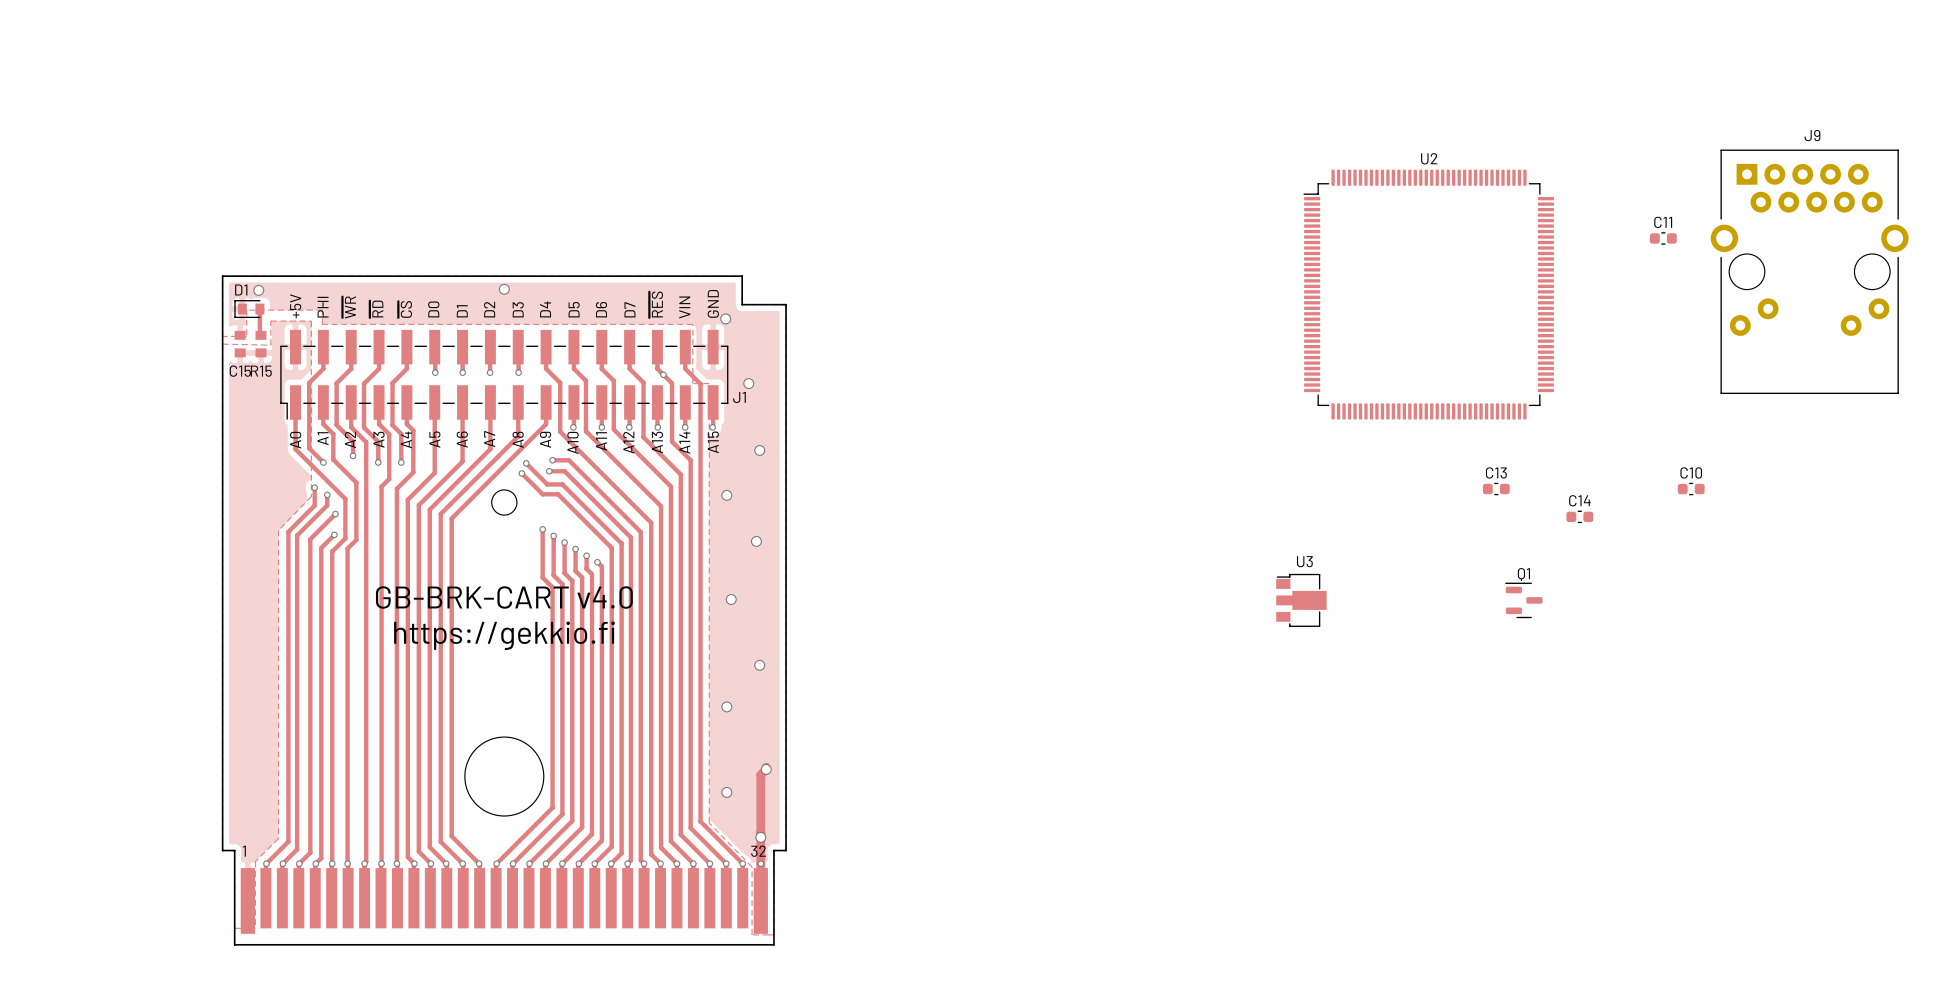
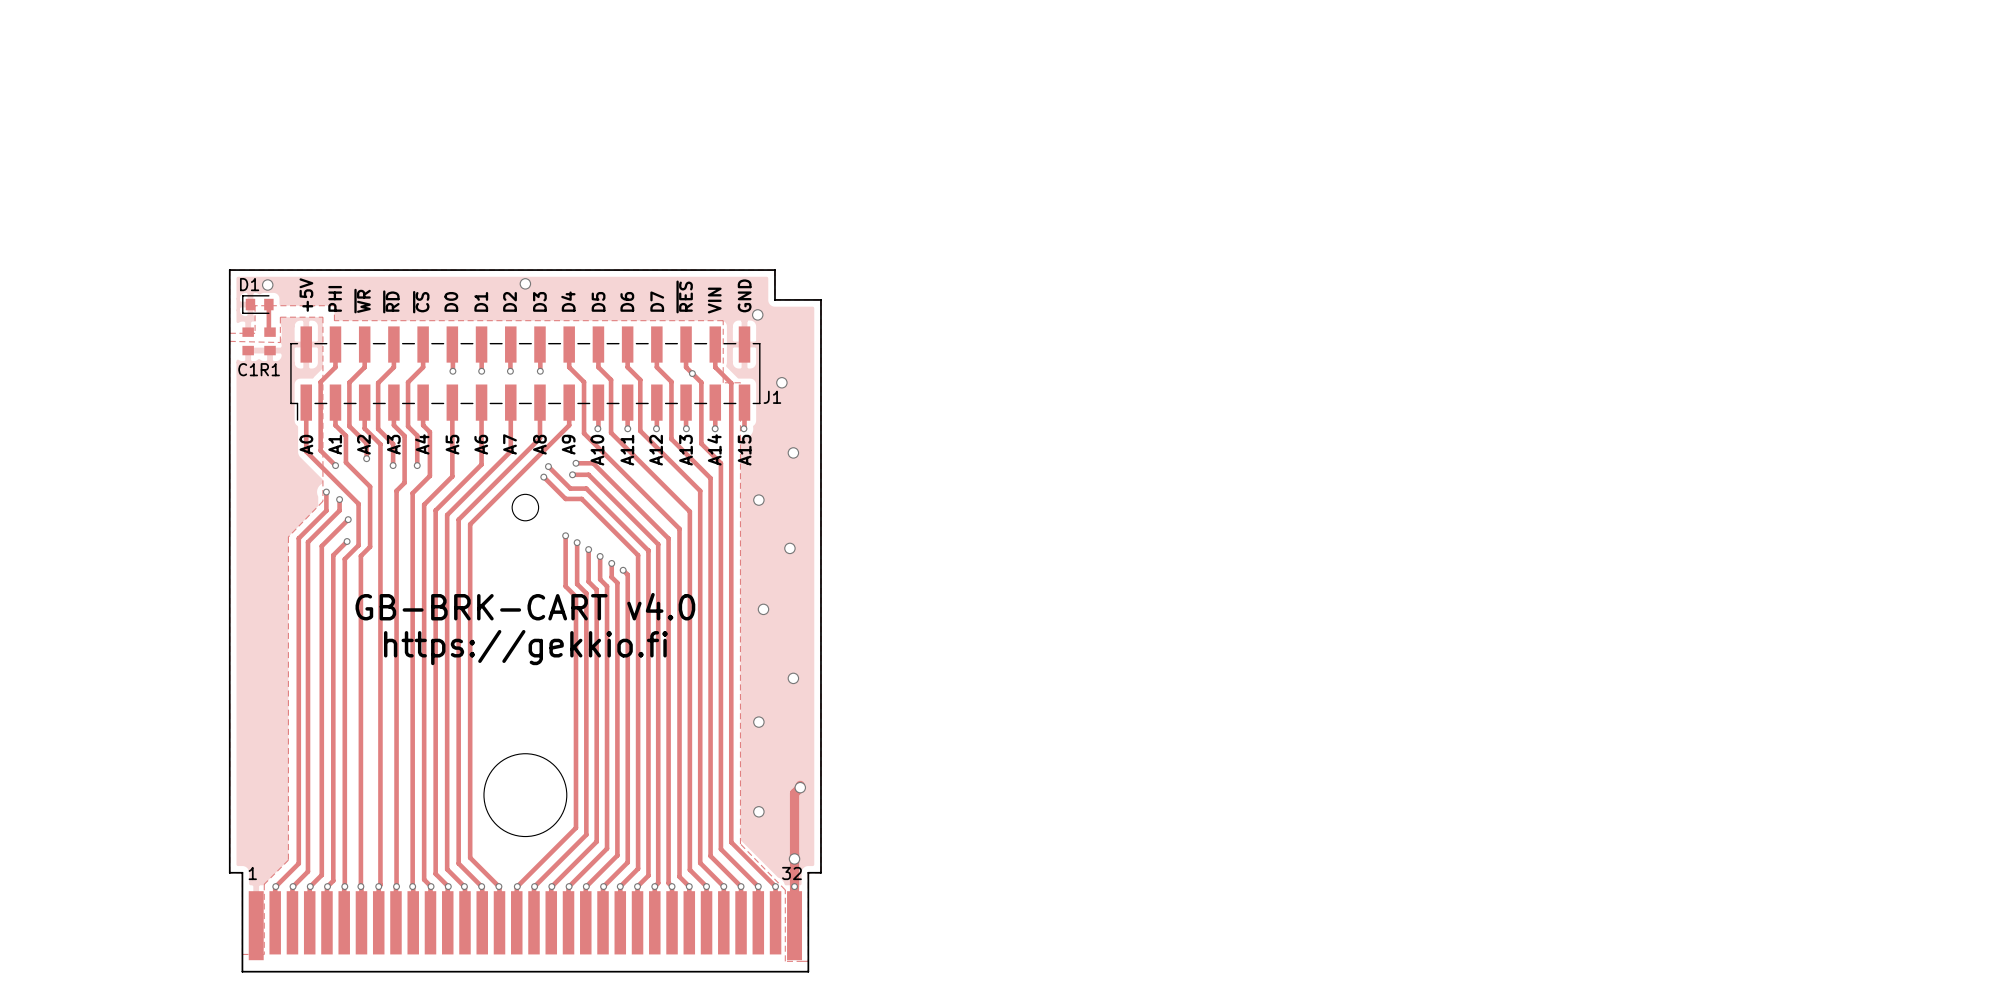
C11: (1663, 238) -> none
J9: (1809, 271) -> none
U2: (1428, 294) -> none
C15 name: C15 (240, 371) -> C1 (248, 369)
R15 name: R15 (261, 371) -> R1 (270, 369)
C13: (1496, 489) -> none
C10: (1691, 489) -> none
C14: (1579, 516) -> none
U3: (1301, 600) -> none
Q1: (1523, 600) -> none

